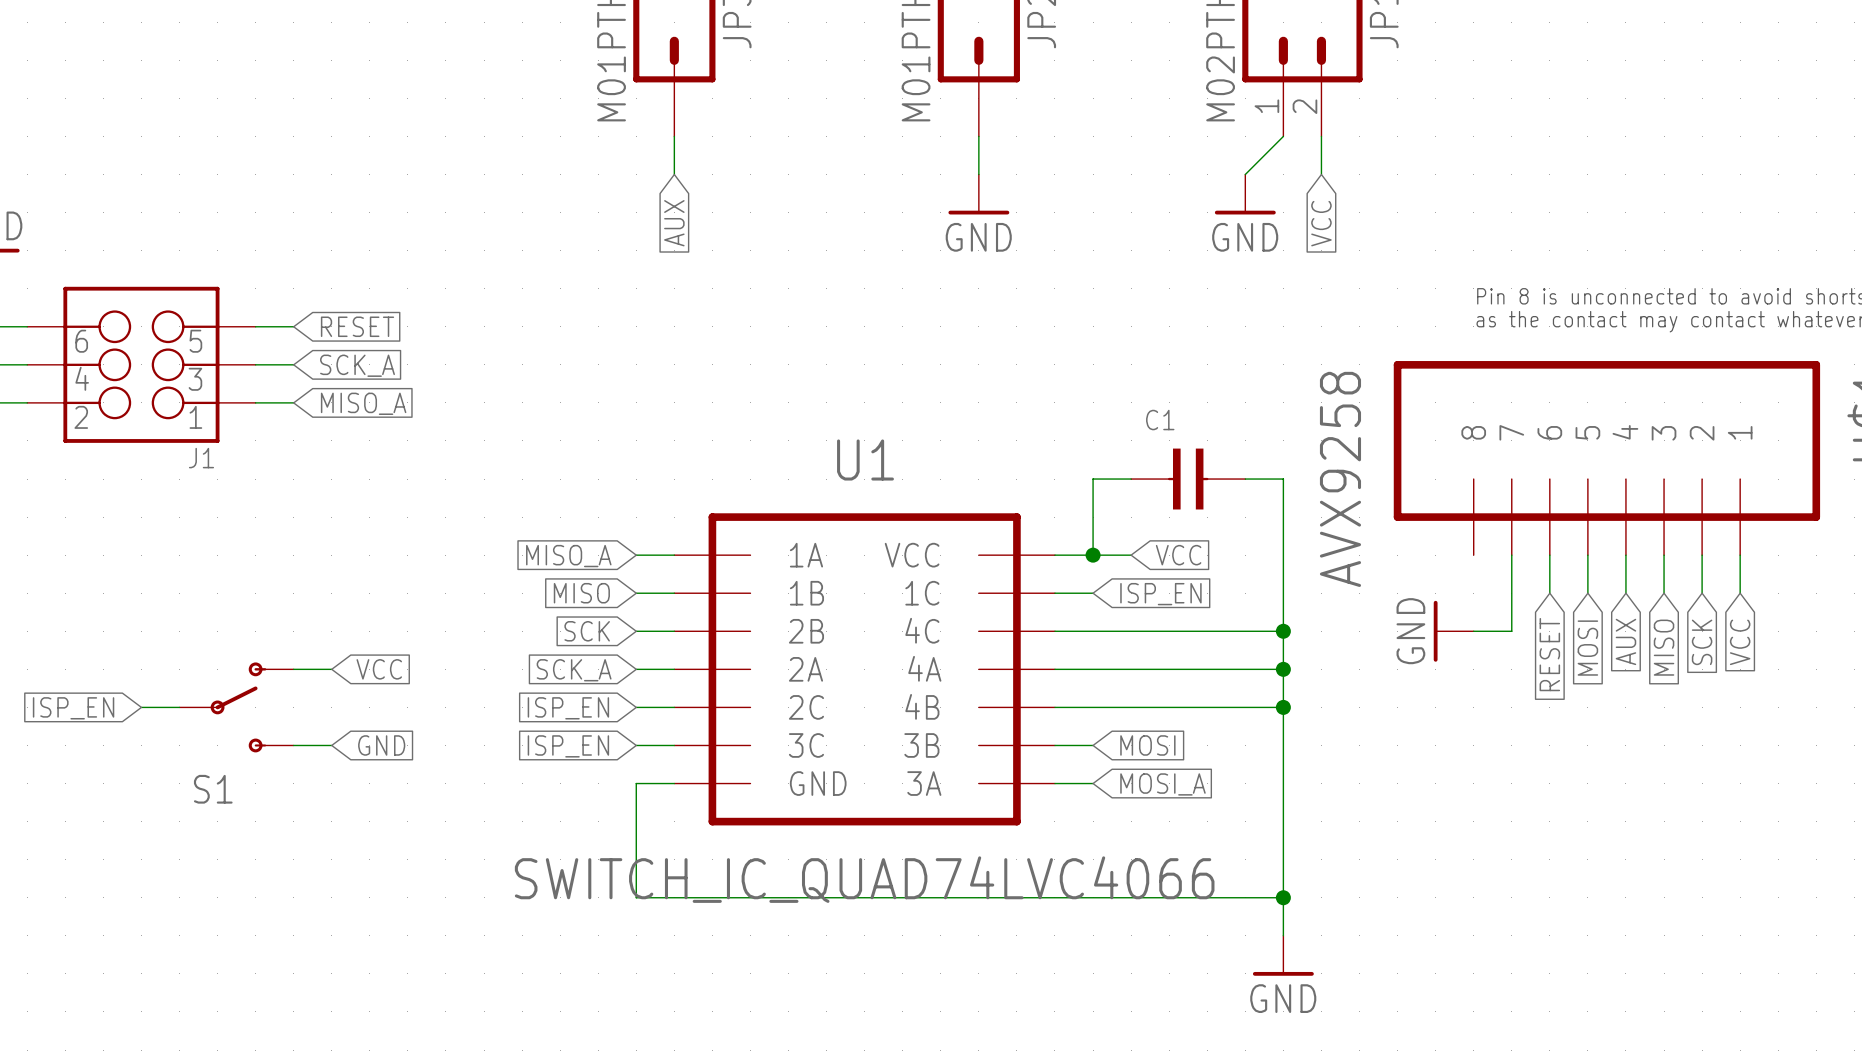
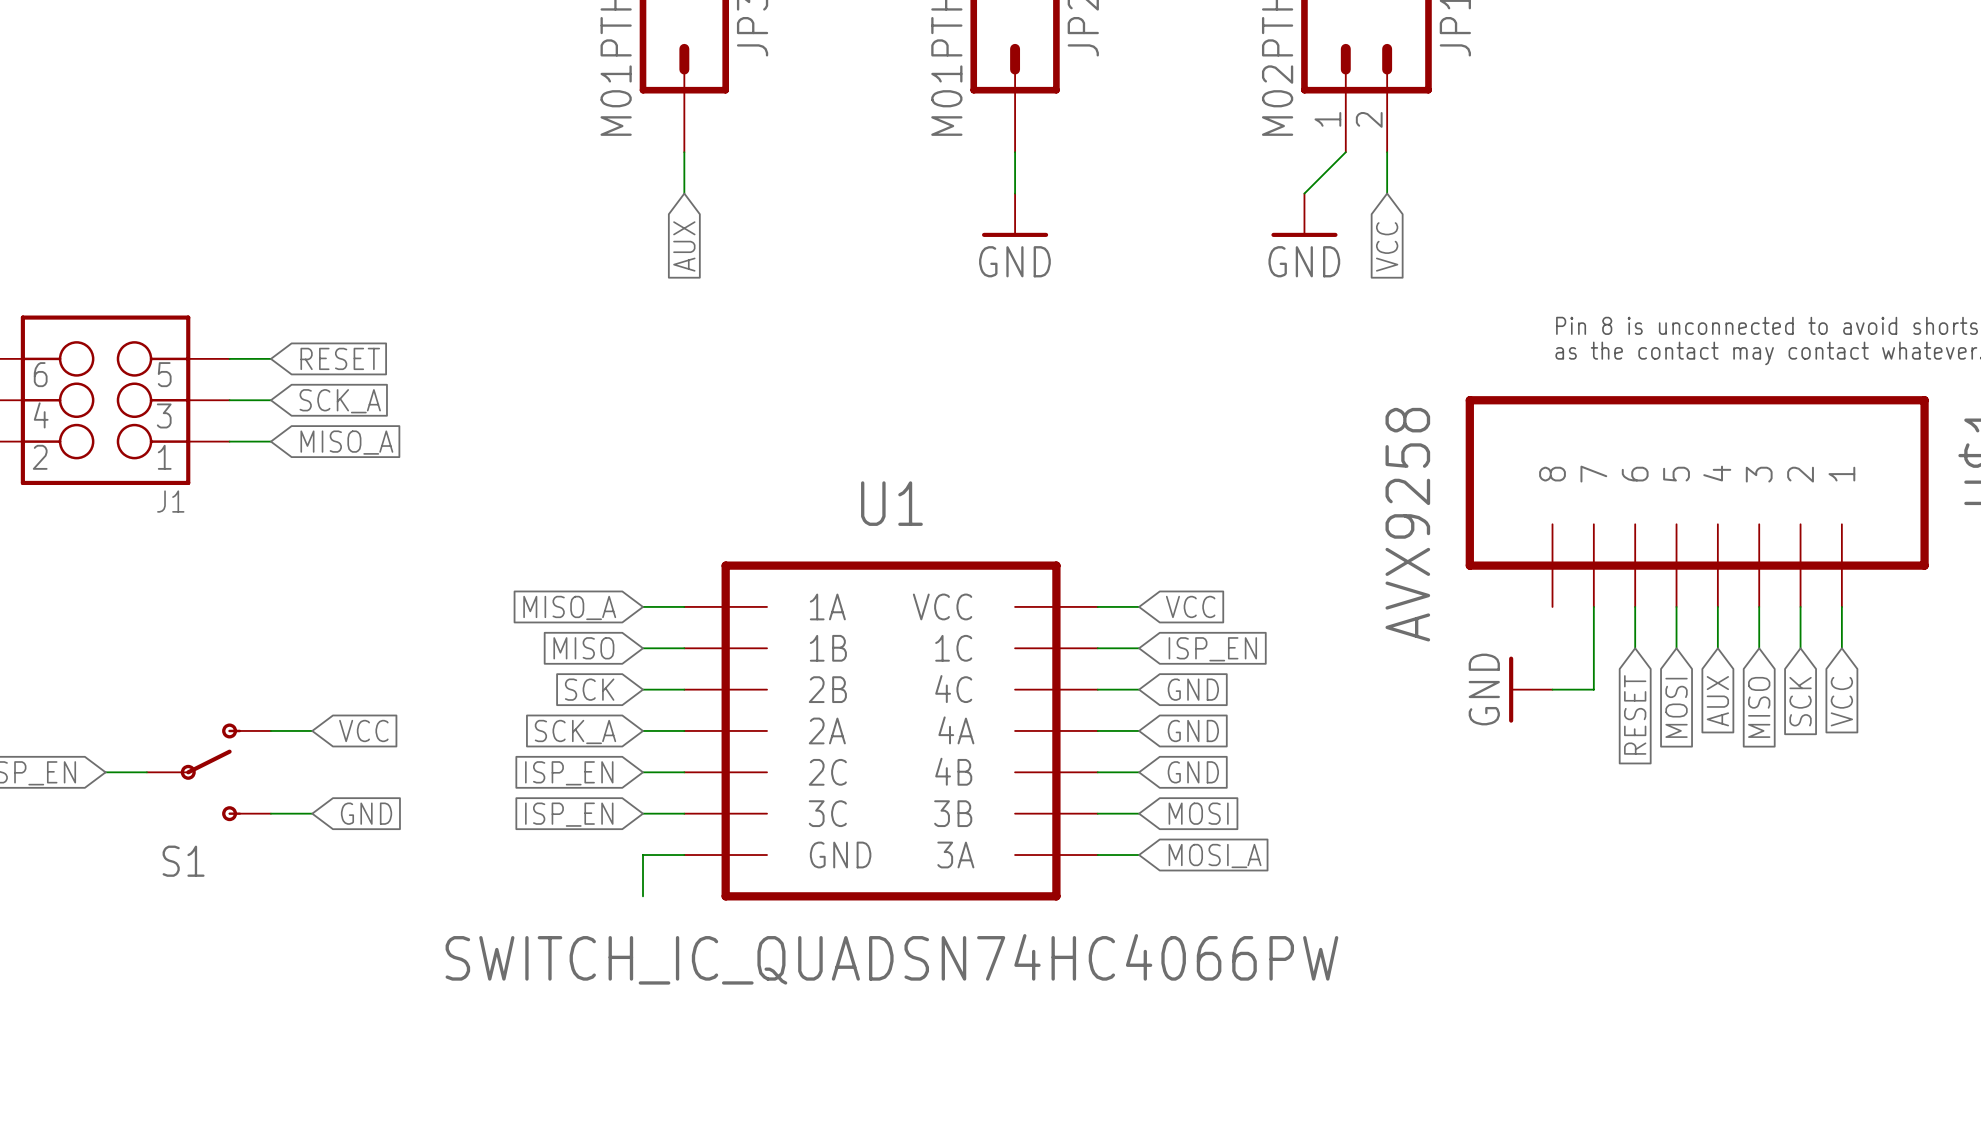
wire: (1131, 479) (1093, 479) (1093, 555) (1131, 555) -> none
C1: (1188, 479) -> none
wire: (1245, 479) (1283, 479) (1283, 935) -> none
junction: (1093, 555) -> none
global label position: VCC (1178, 555) -> VCC (1190, 606)
wire: (1093, 631) (1283, 631) -> none
global label: none -> GND (1193, 689)
junction: (1283, 631) -> none
wire: (1093, 669) (1283, 669) -> none
global label: none -> GND (1193, 730)
junction: (1283, 669) -> none
wire: (1093, 707) (1283, 707) -> none
global label: none -> GND (1193, 772)
junction: (1283, 707) -> none
wire: (636, 821) (636, 897) (1283, 897) -> none
U1 value: SWITCH_IC_QUAD74LVC4066 (864, 879) -> SWITCH_IC_QUADSN74HC4066PW (891, 959)
junction: (1283, 897) -> none
power symbol: GND (1283, 955) -> none

